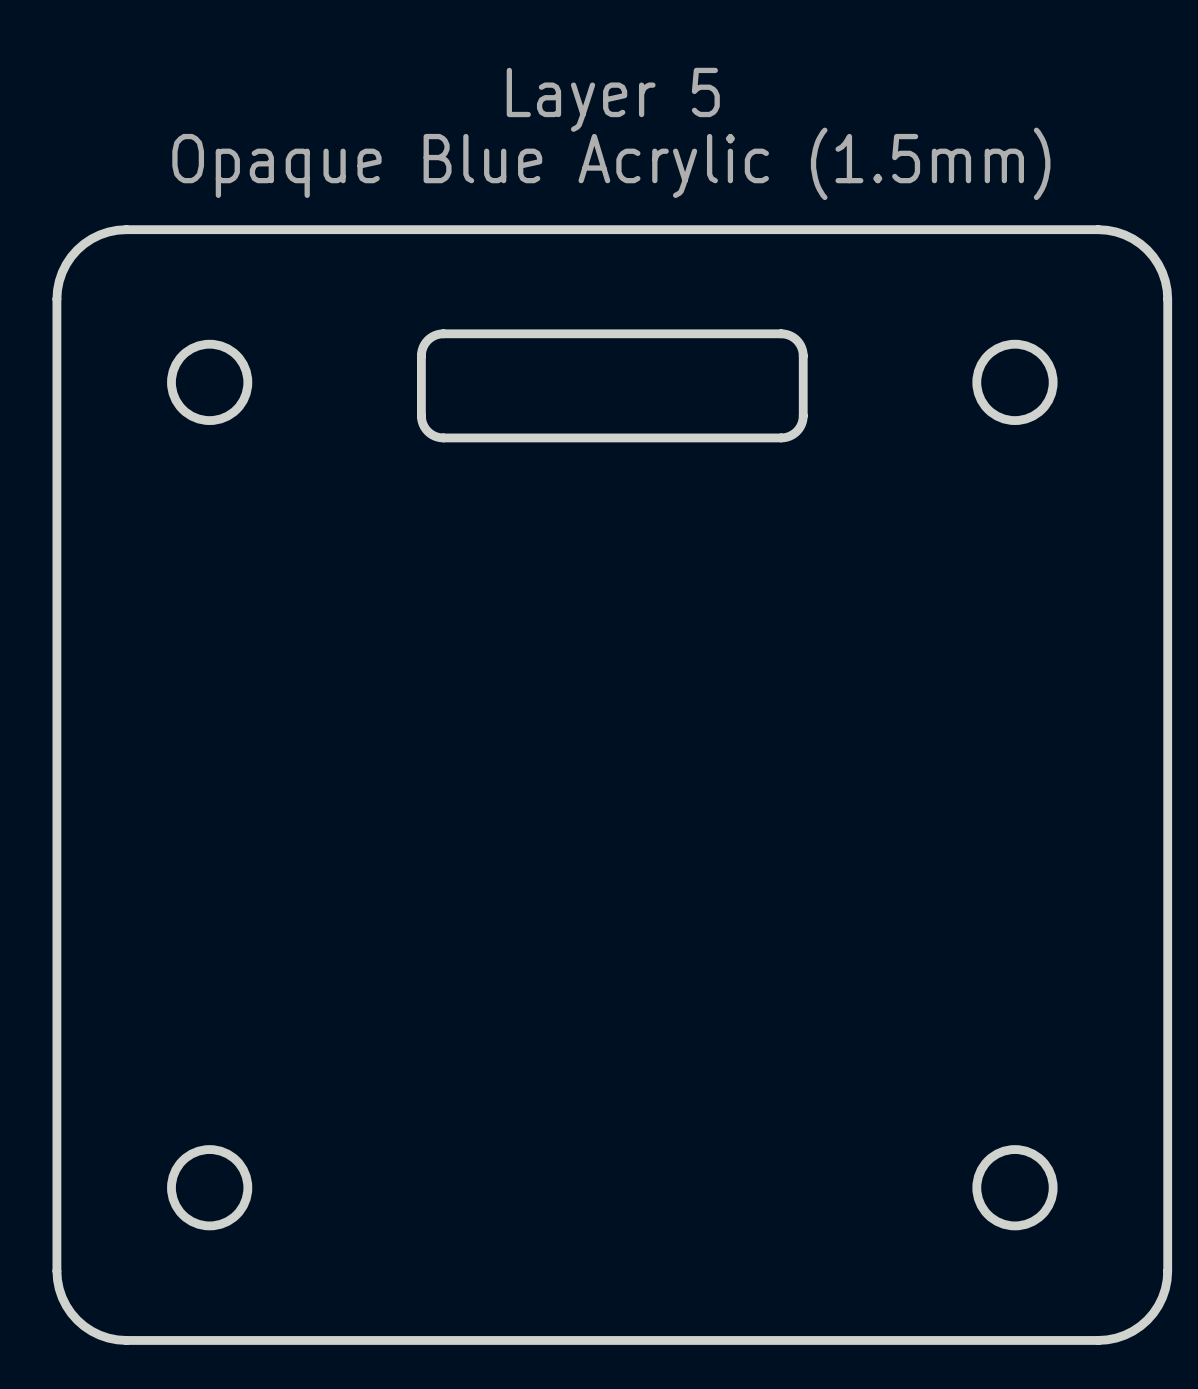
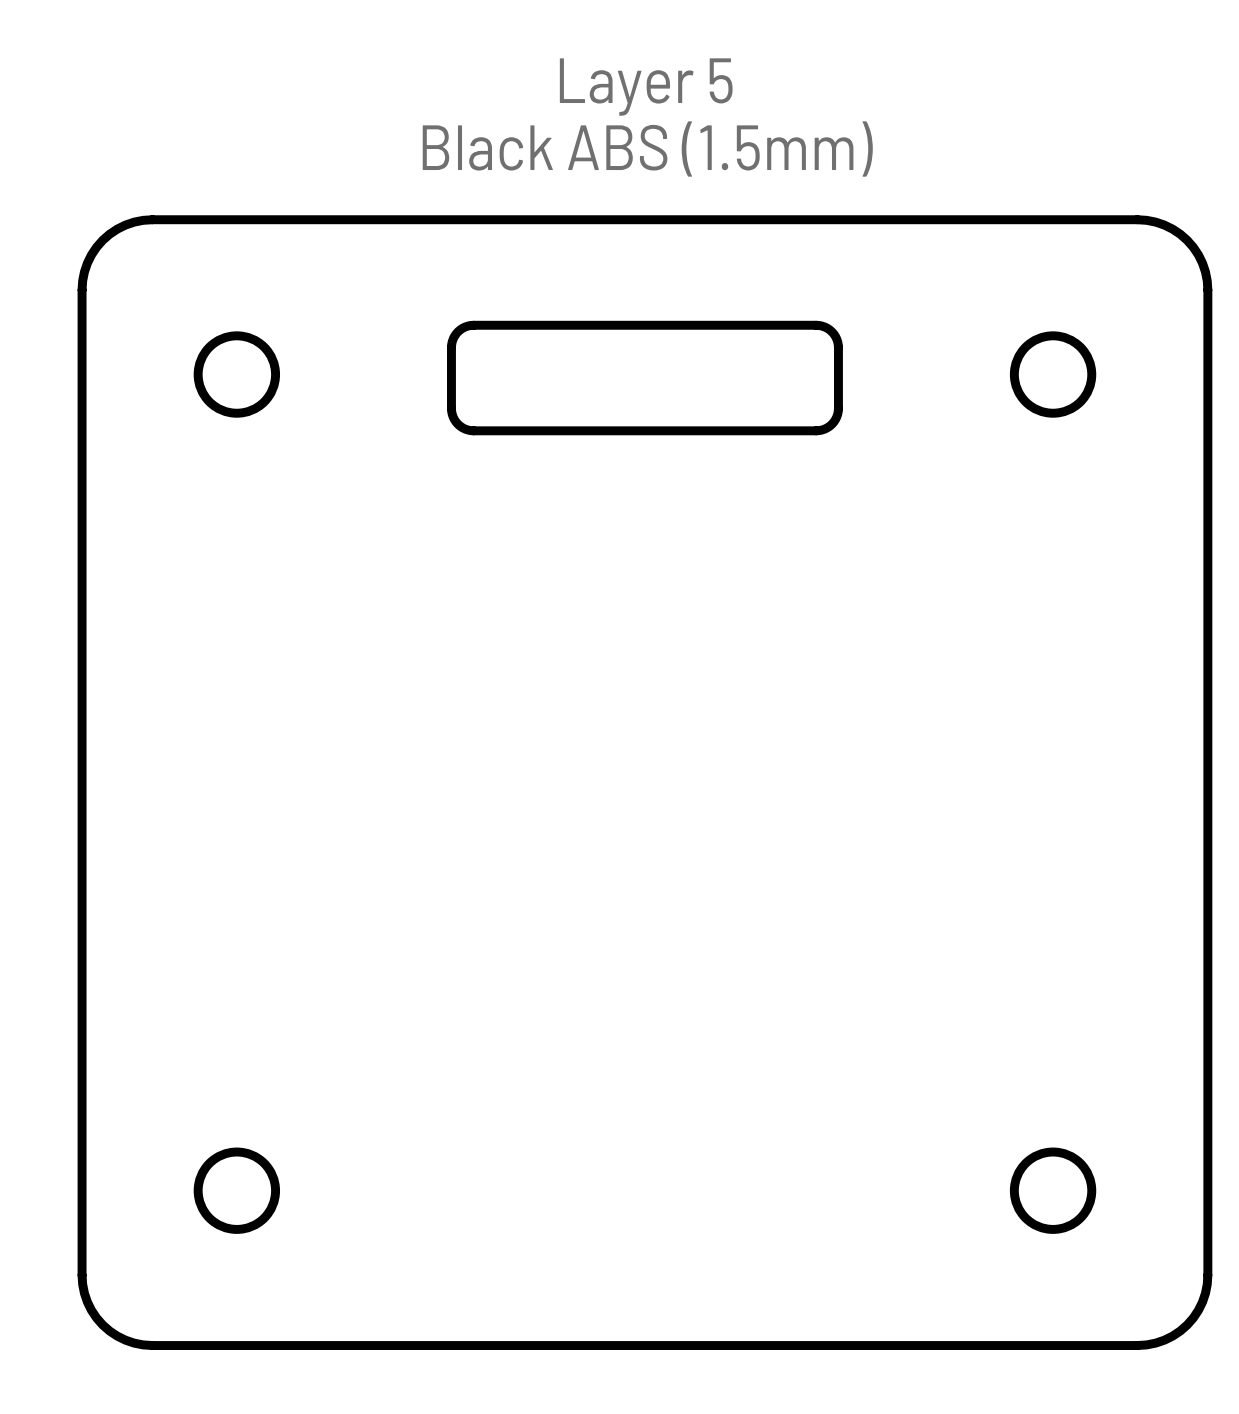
text: Opaque Blue Acrylic (1.5mm) (611, 163) -> Black ABS (1.5mm) (647, 149)

